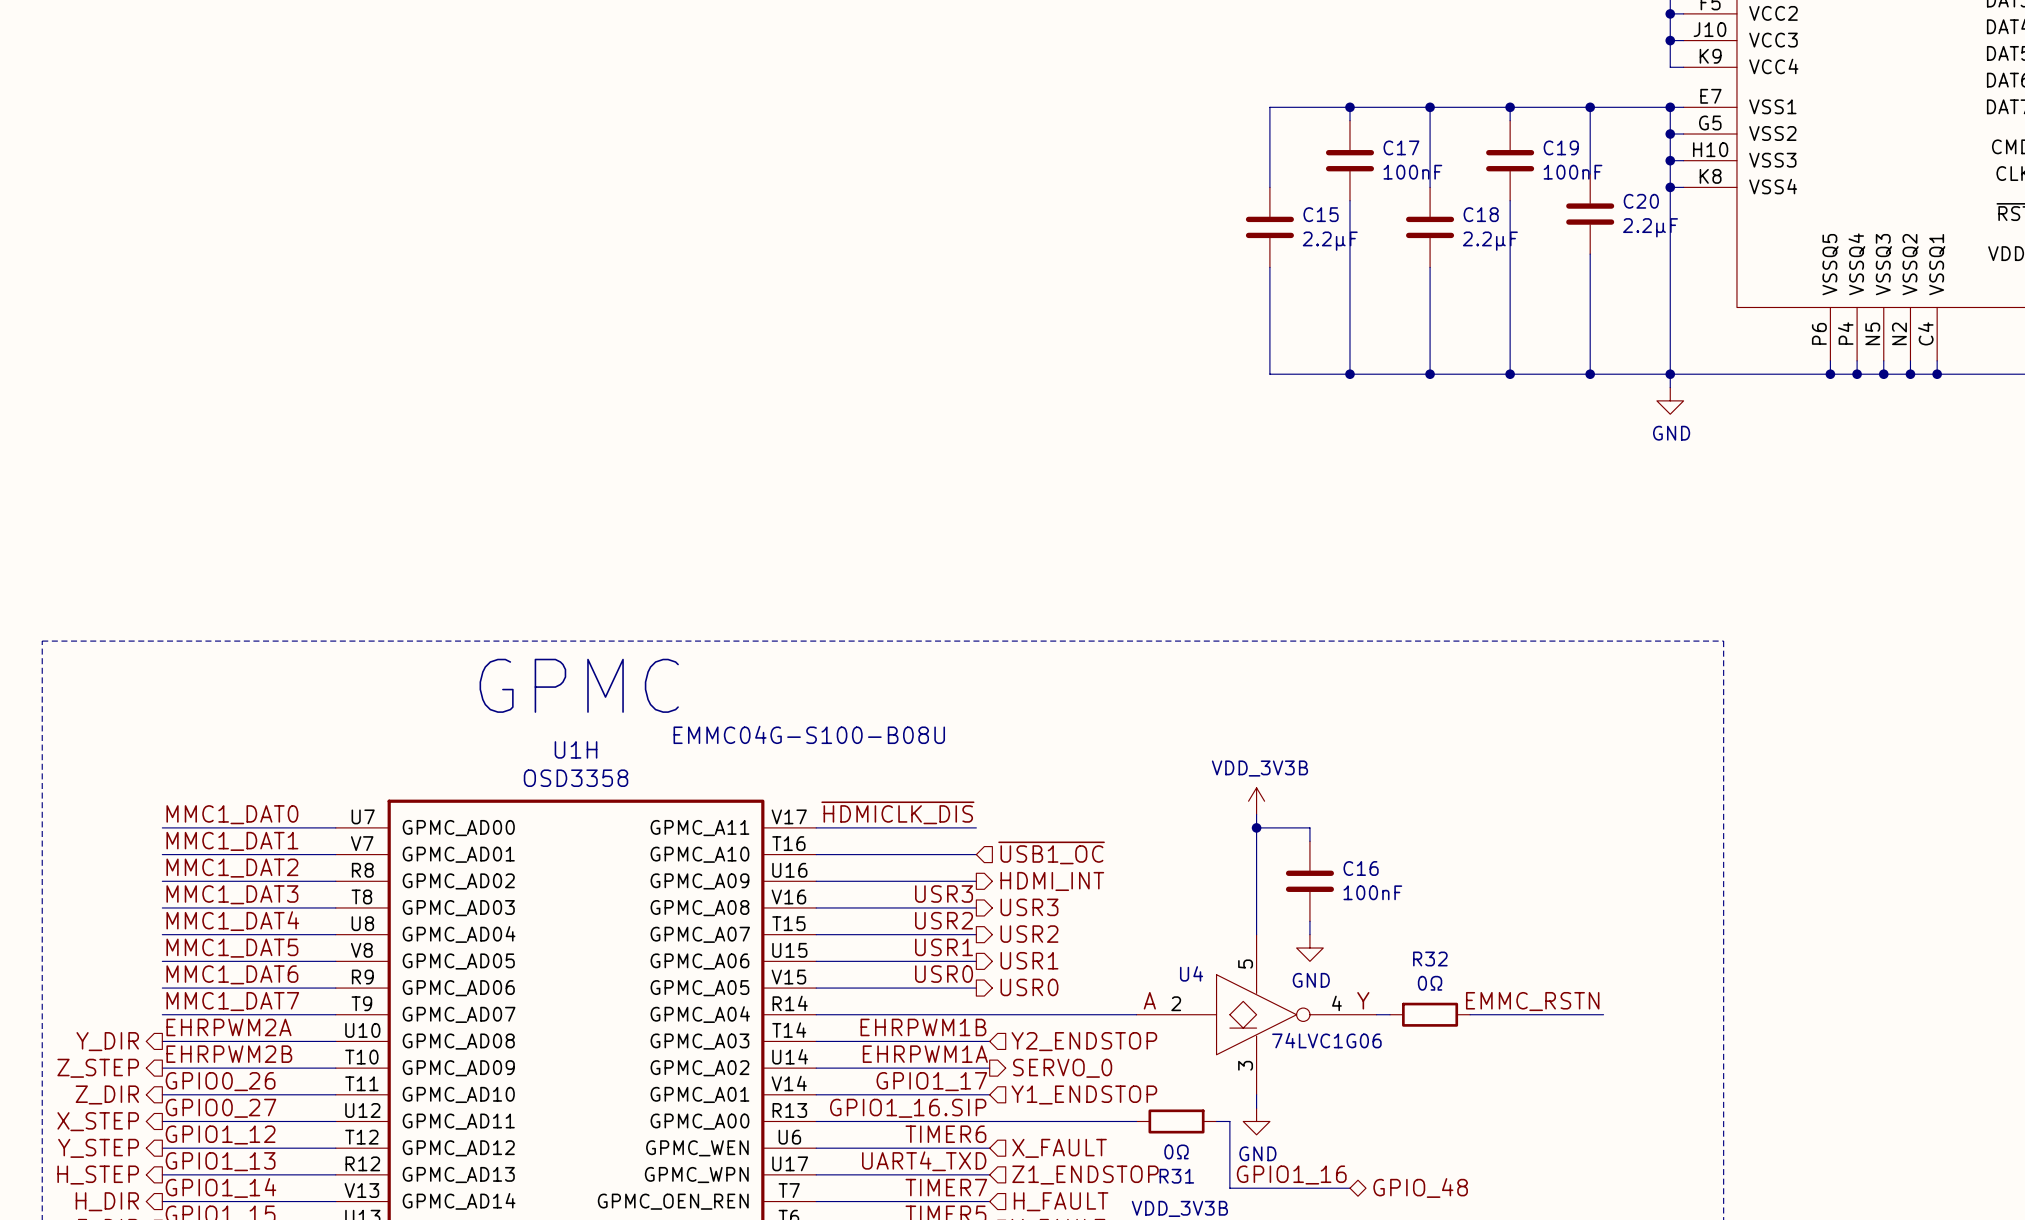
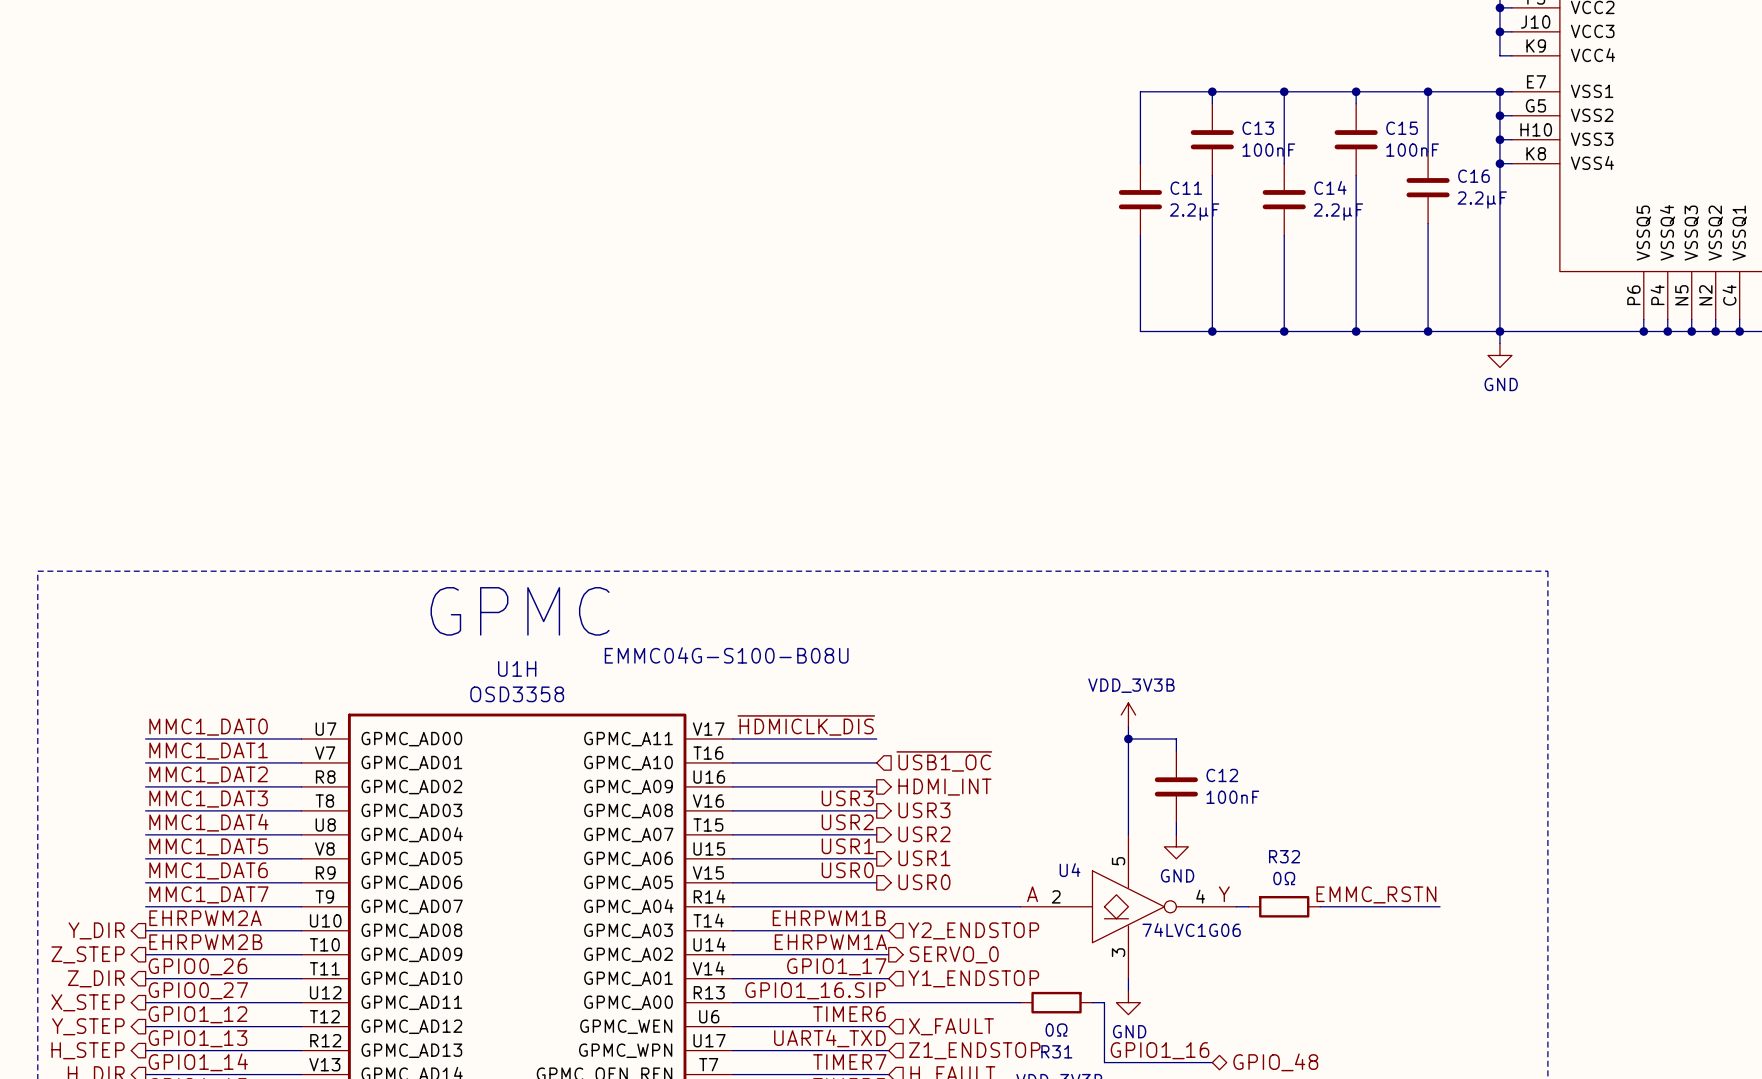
C17 name: C17 (1401, 147) -> C13 (1258, 128)
C19 name: C19 (1561, 147) -> C15 (1402, 128)
C20 name: C20 (1641, 201) -> C16 (1473, 176)
C15 name: C15 (1321, 214) -> C11 (1186, 188)
C18 name: C18 (1481, 214) -> C14 (1330, 187)
C16 name: C16 (1361, 868) -> C12 (1222, 775)

